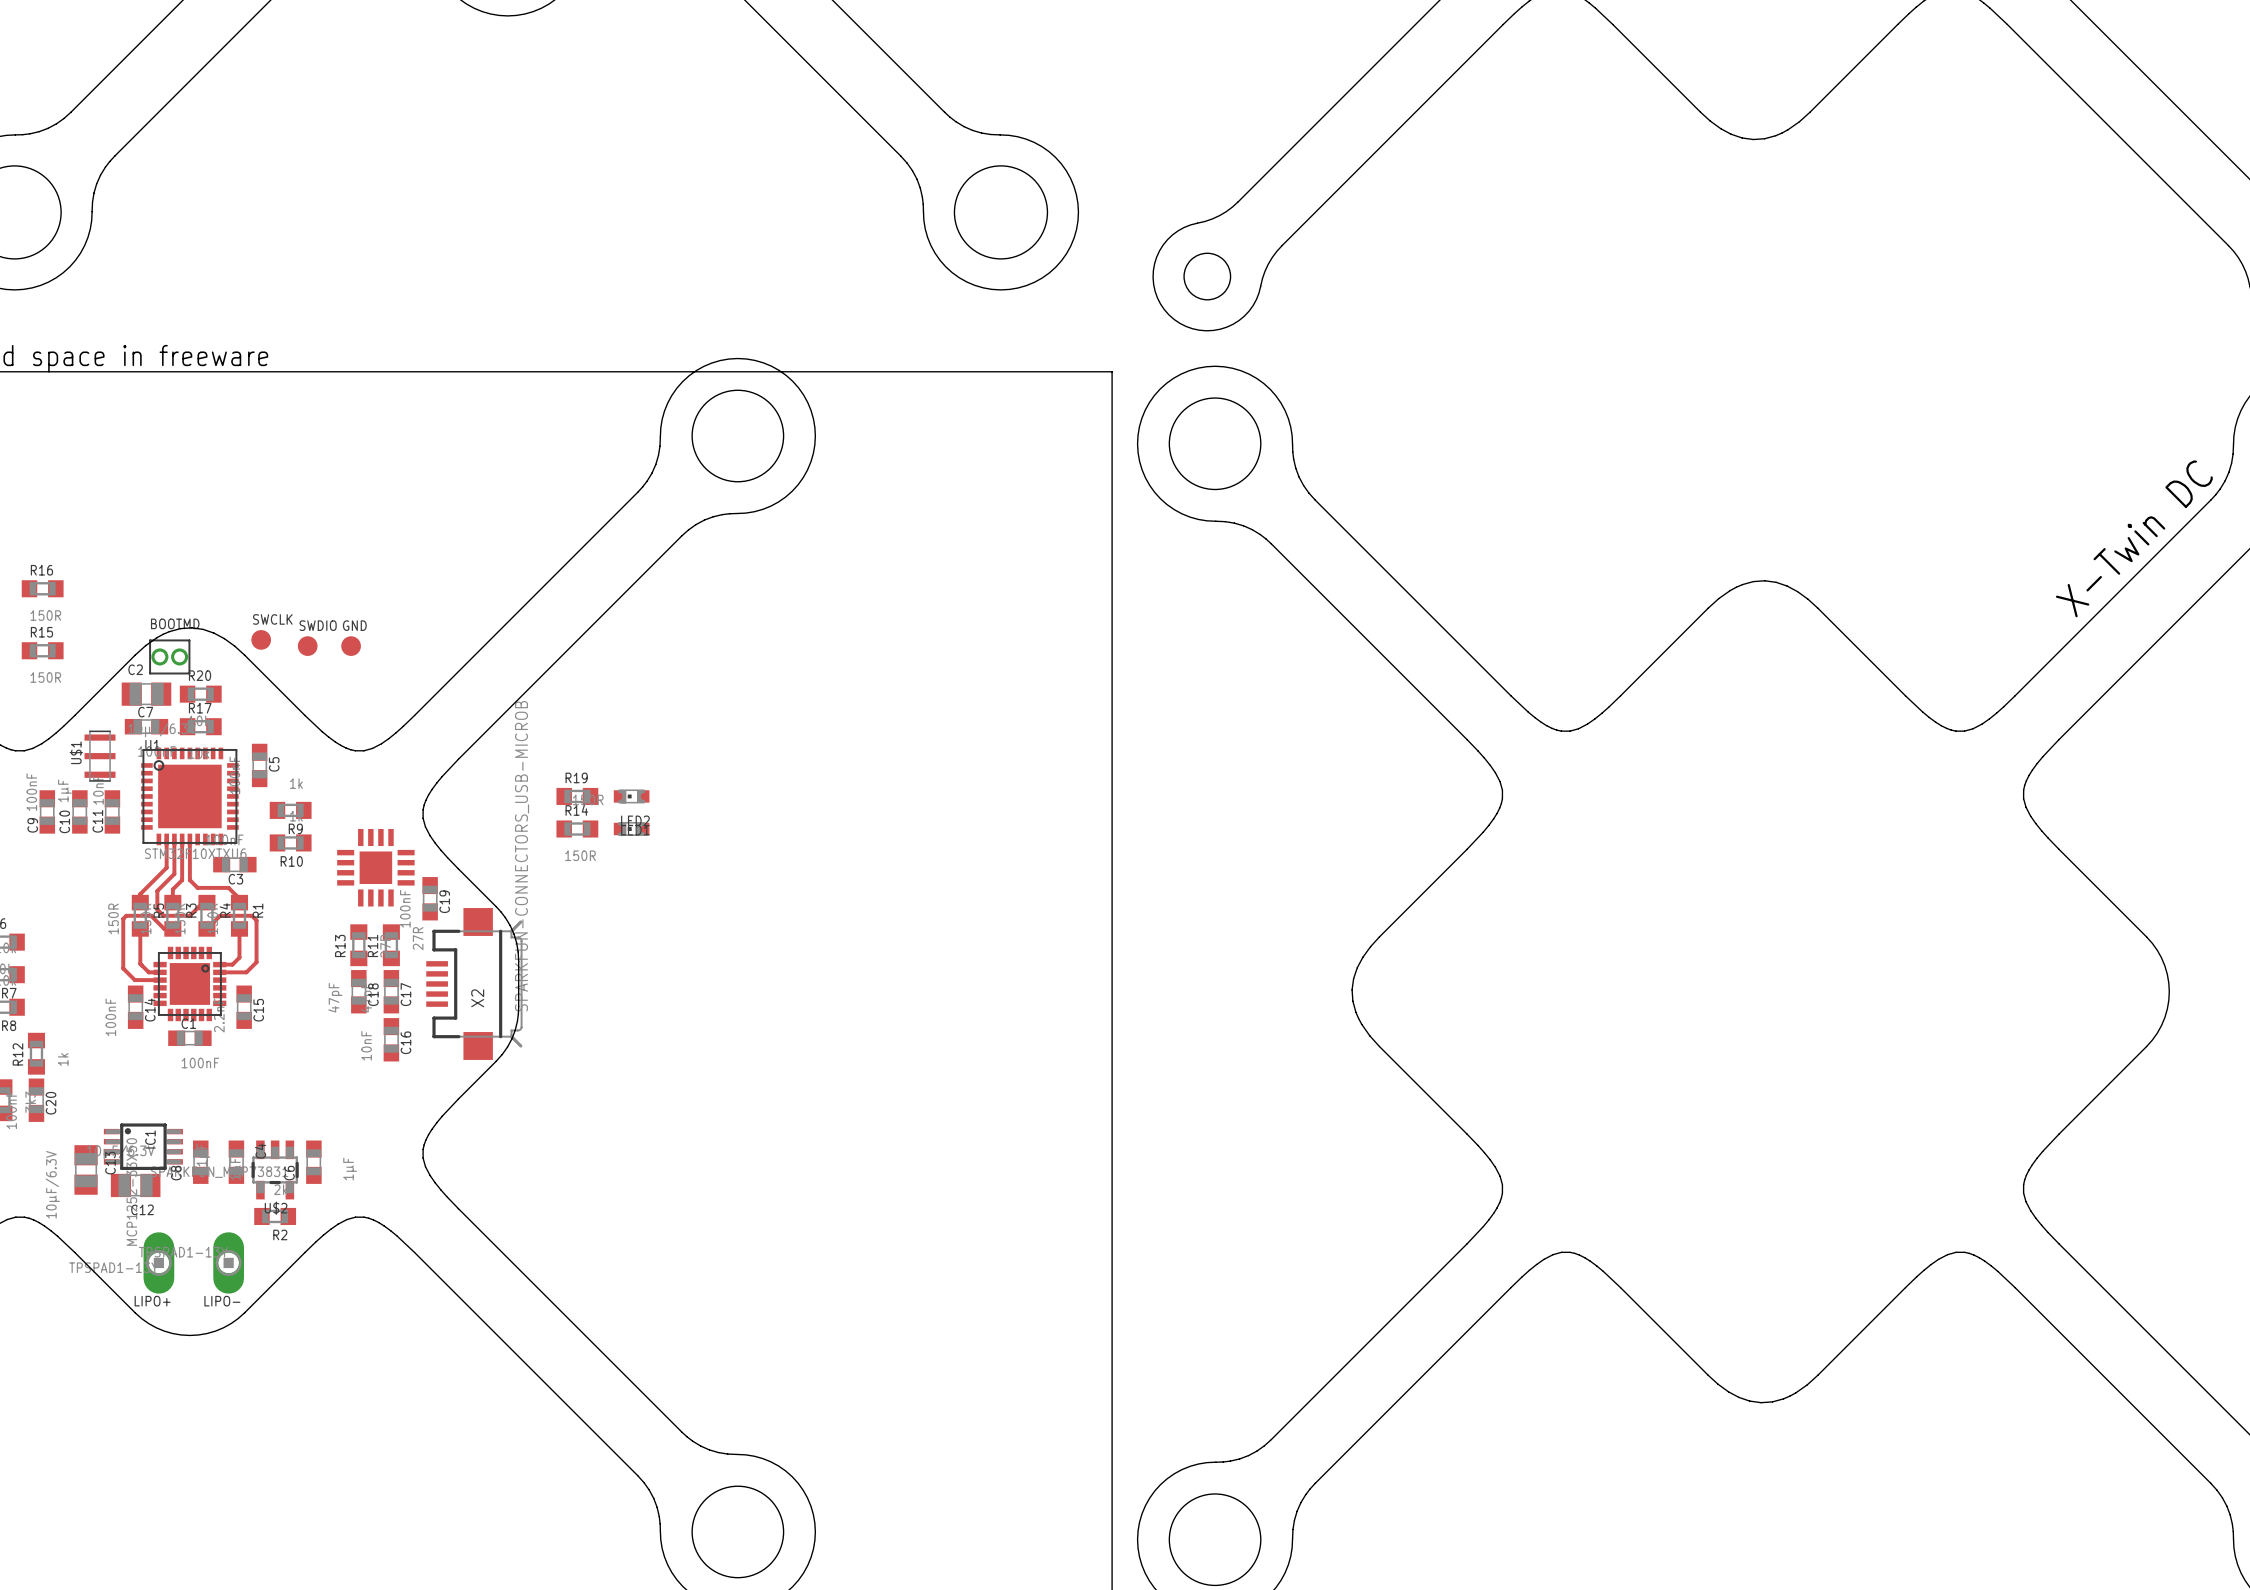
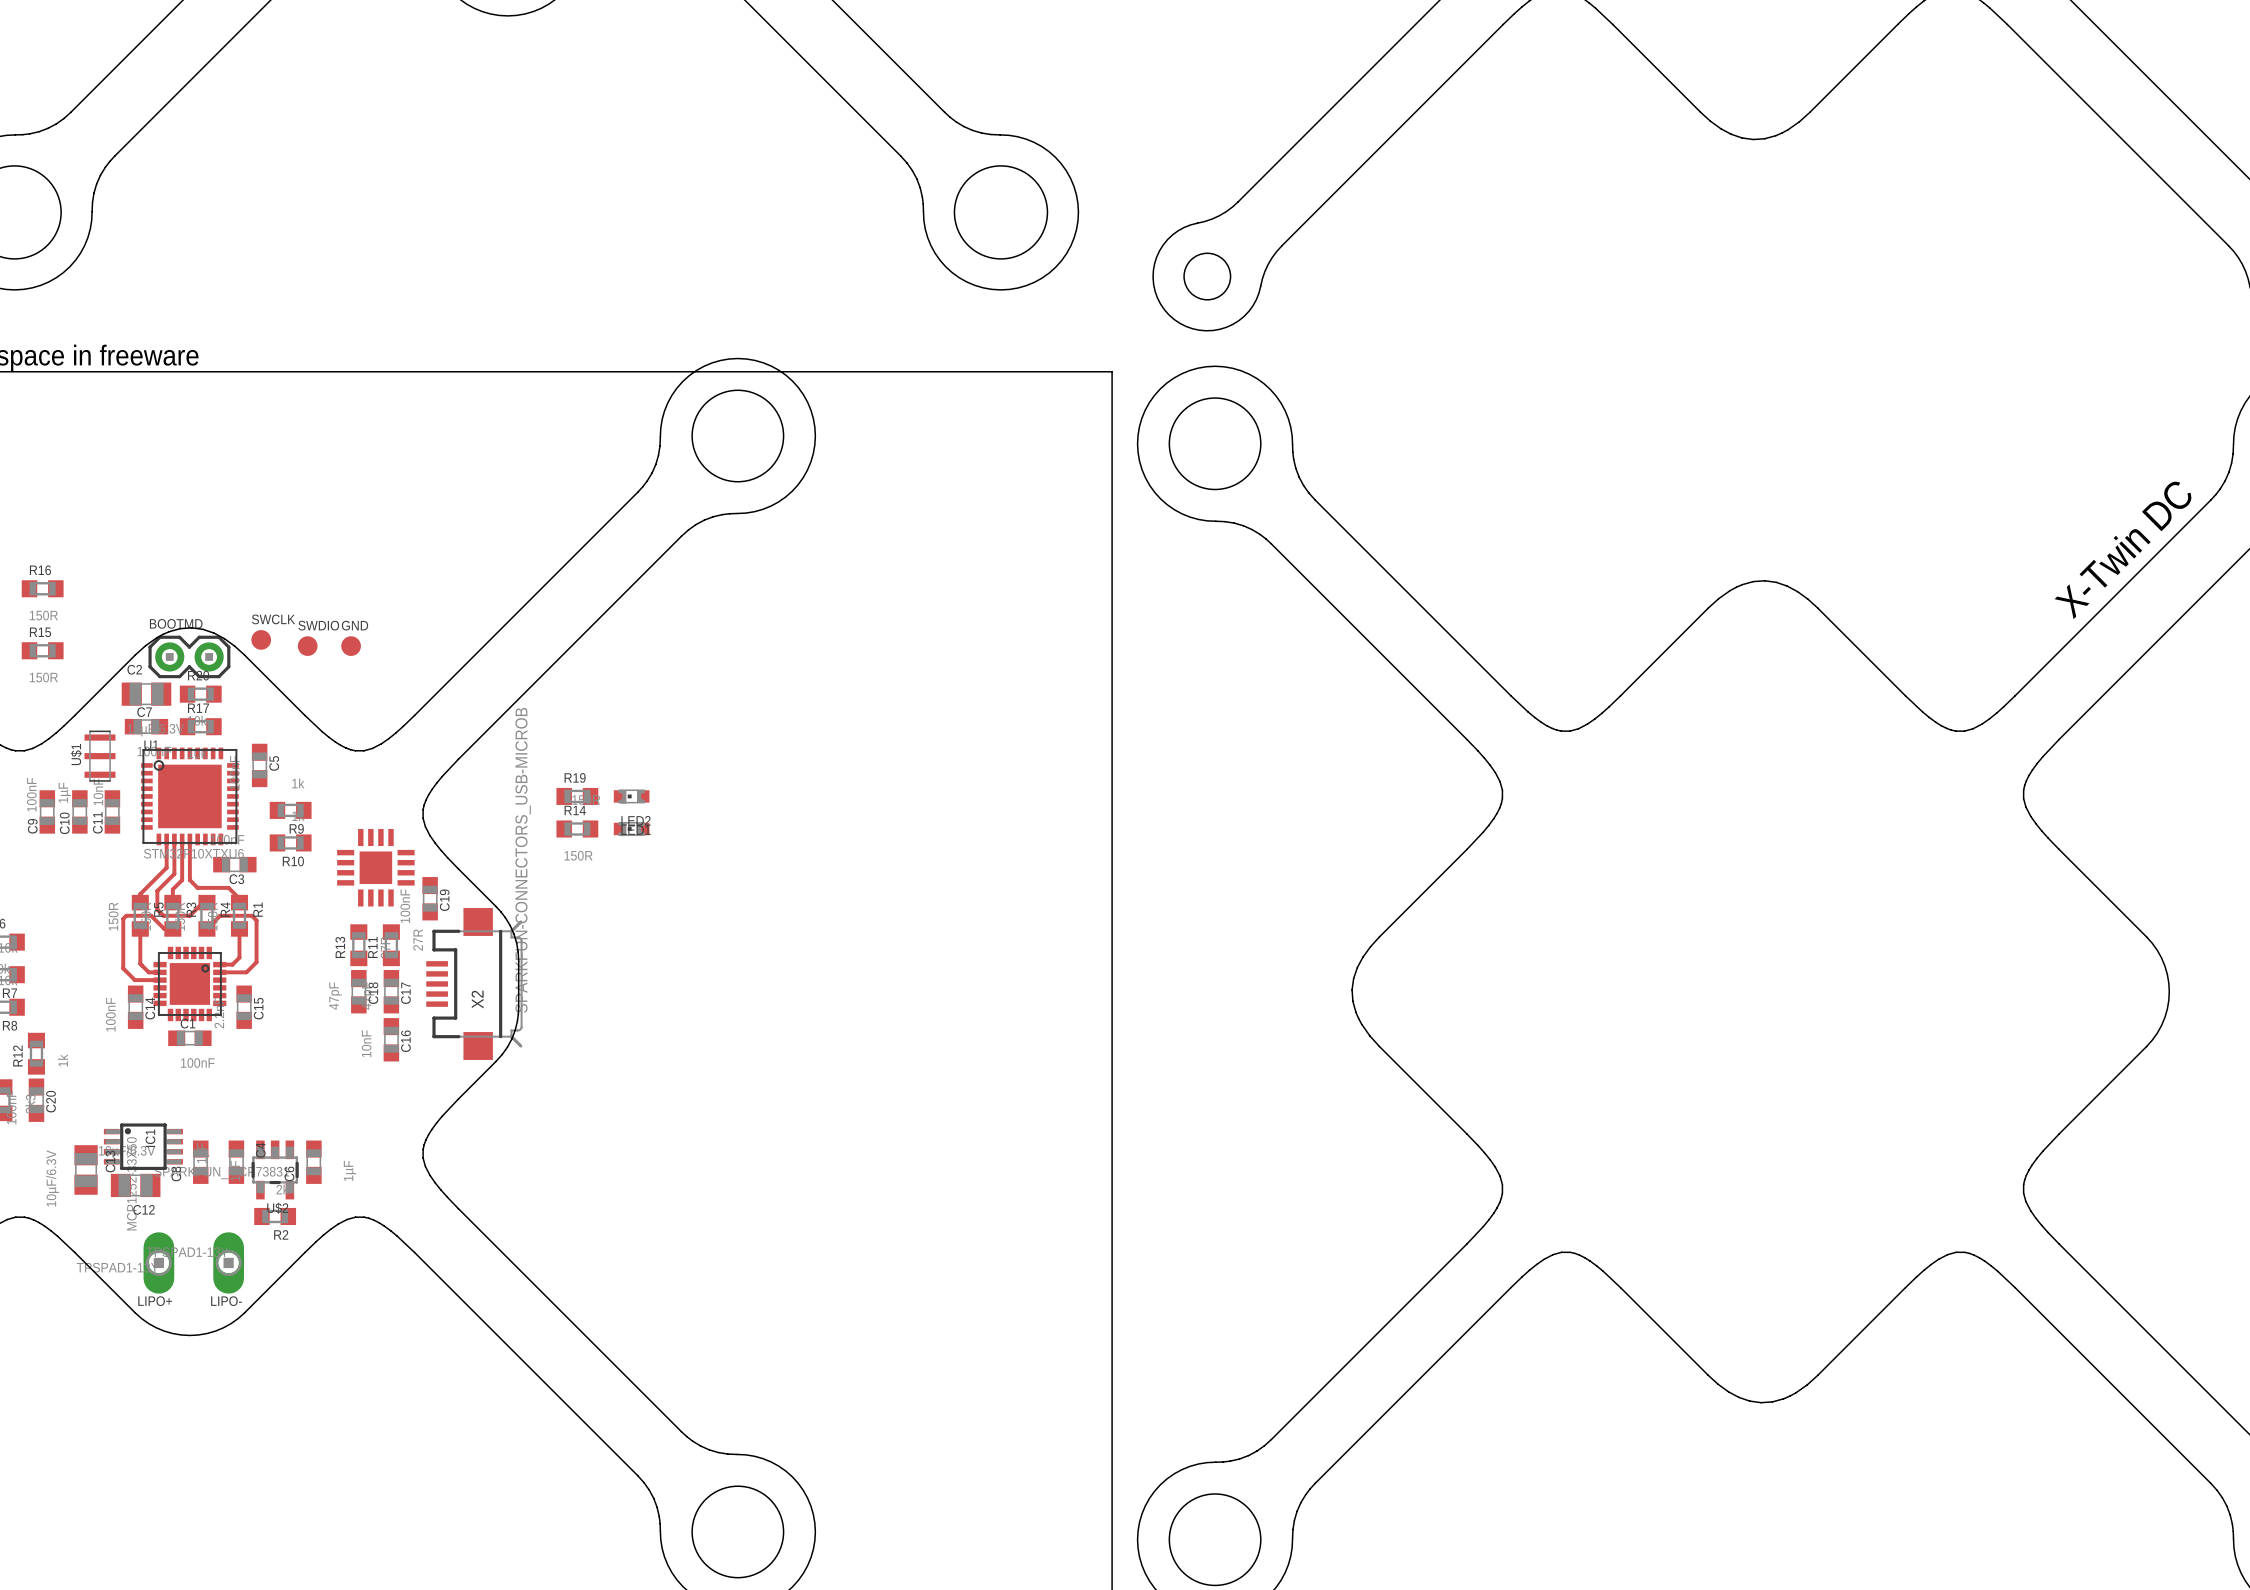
BOOTMD: (169, 656) -> none
BOOTMD: none -> (189, 656)

